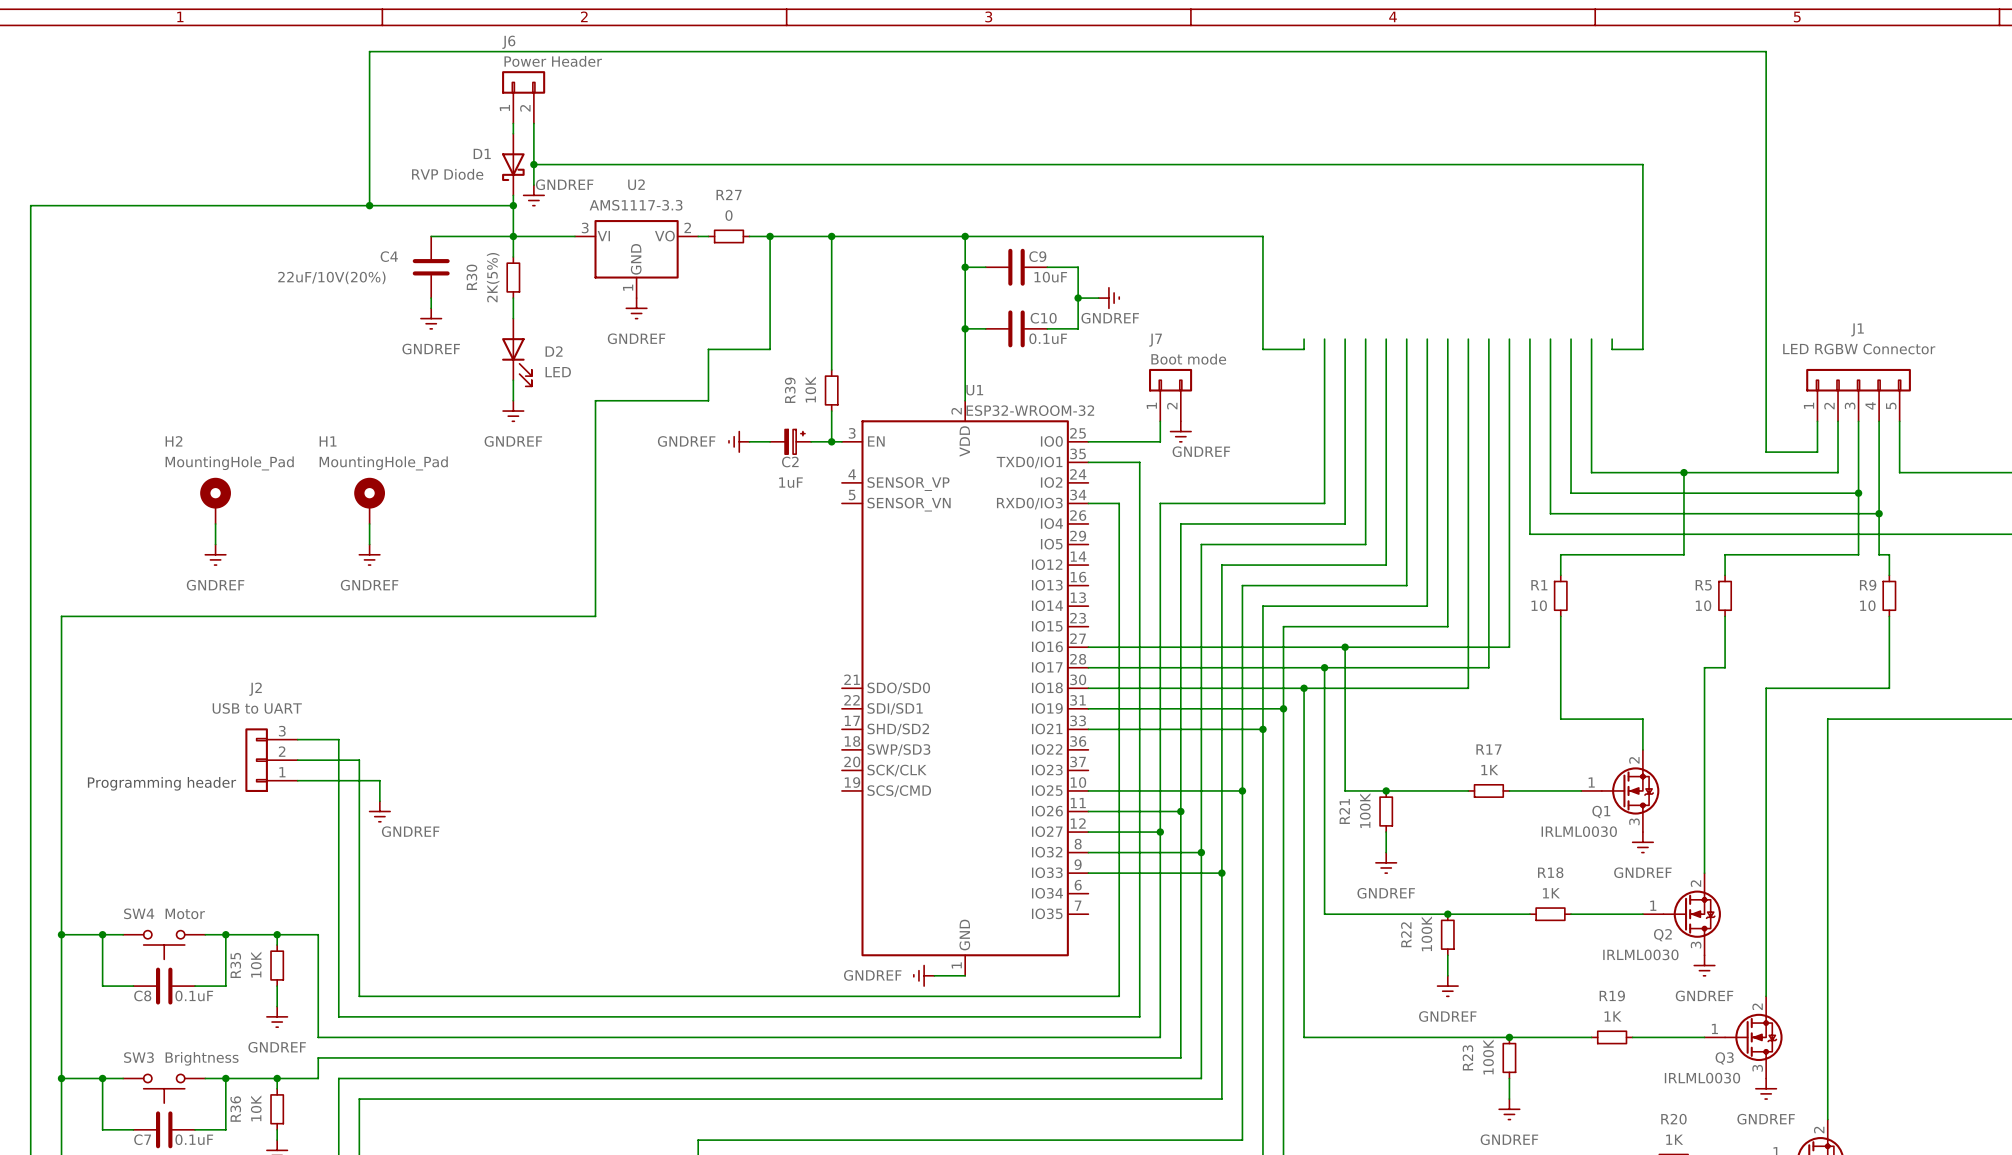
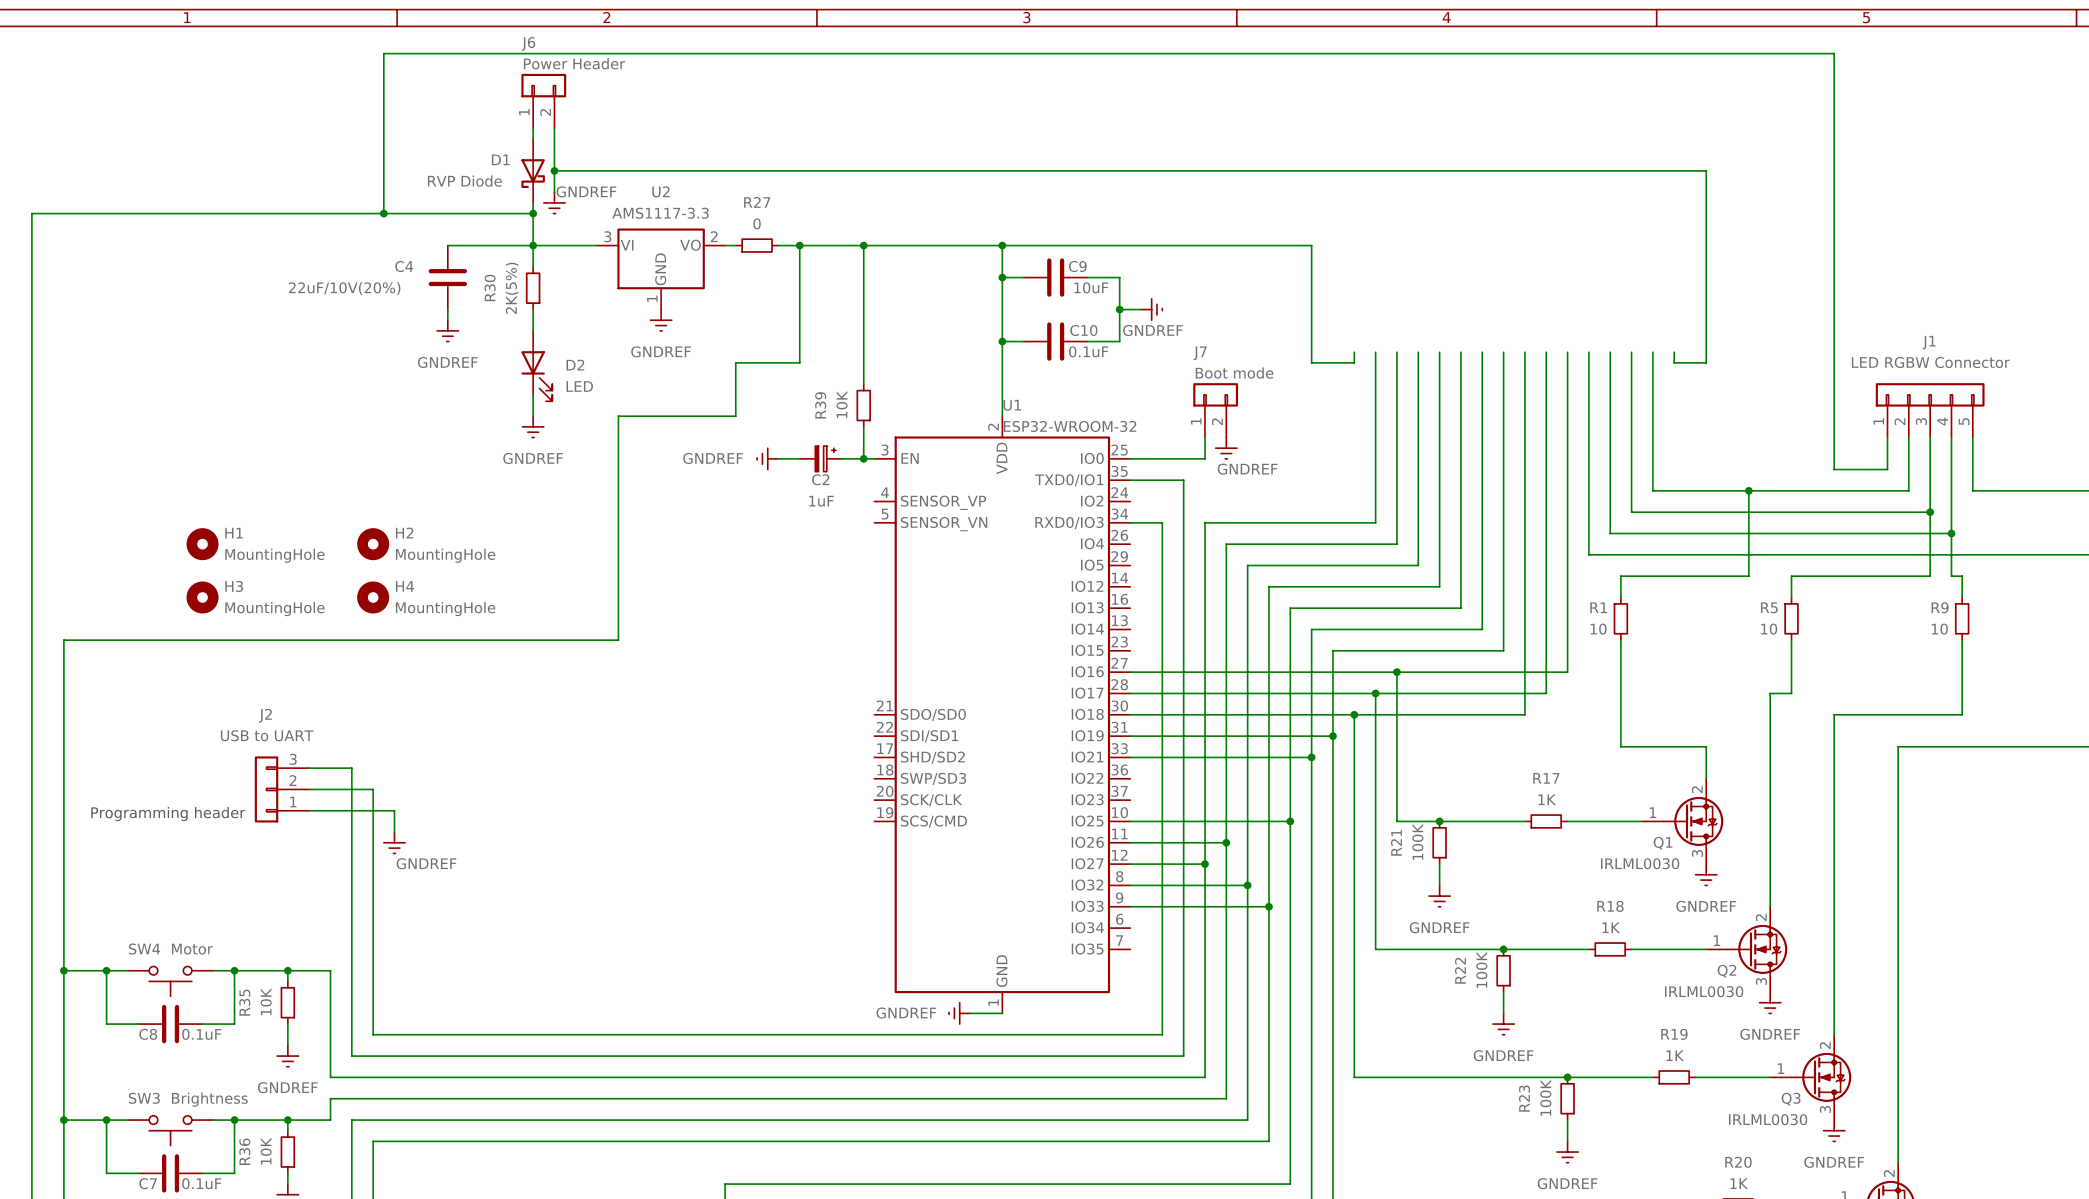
H2 name position: H2 (173, 441) -> H2 (404, 533)
H1 name position: H1 (328, 441) -> H1 (234, 533)
H2 value: MountingHole_Pad (229, 463) -> MountingHole (445, 555)
H1 value: MountingHole_Pad (383, 463) -> MountingHole (274, 555)
H2 symbol: [200, 477, 231, 524] -> [357, 528, 390, 561]
H1 symbol: [354, 477, 386, 524] -> [186, 528, 219, 561]
wire: (215, 523) (215, 544) -> none
power symbol: GNDREF (215, 554) -> none
power symbol: GNDREF (369, 554) -> none
H3: none -> MountingHole (202, 597)
H4: none -> MountingHole (373, 597)

